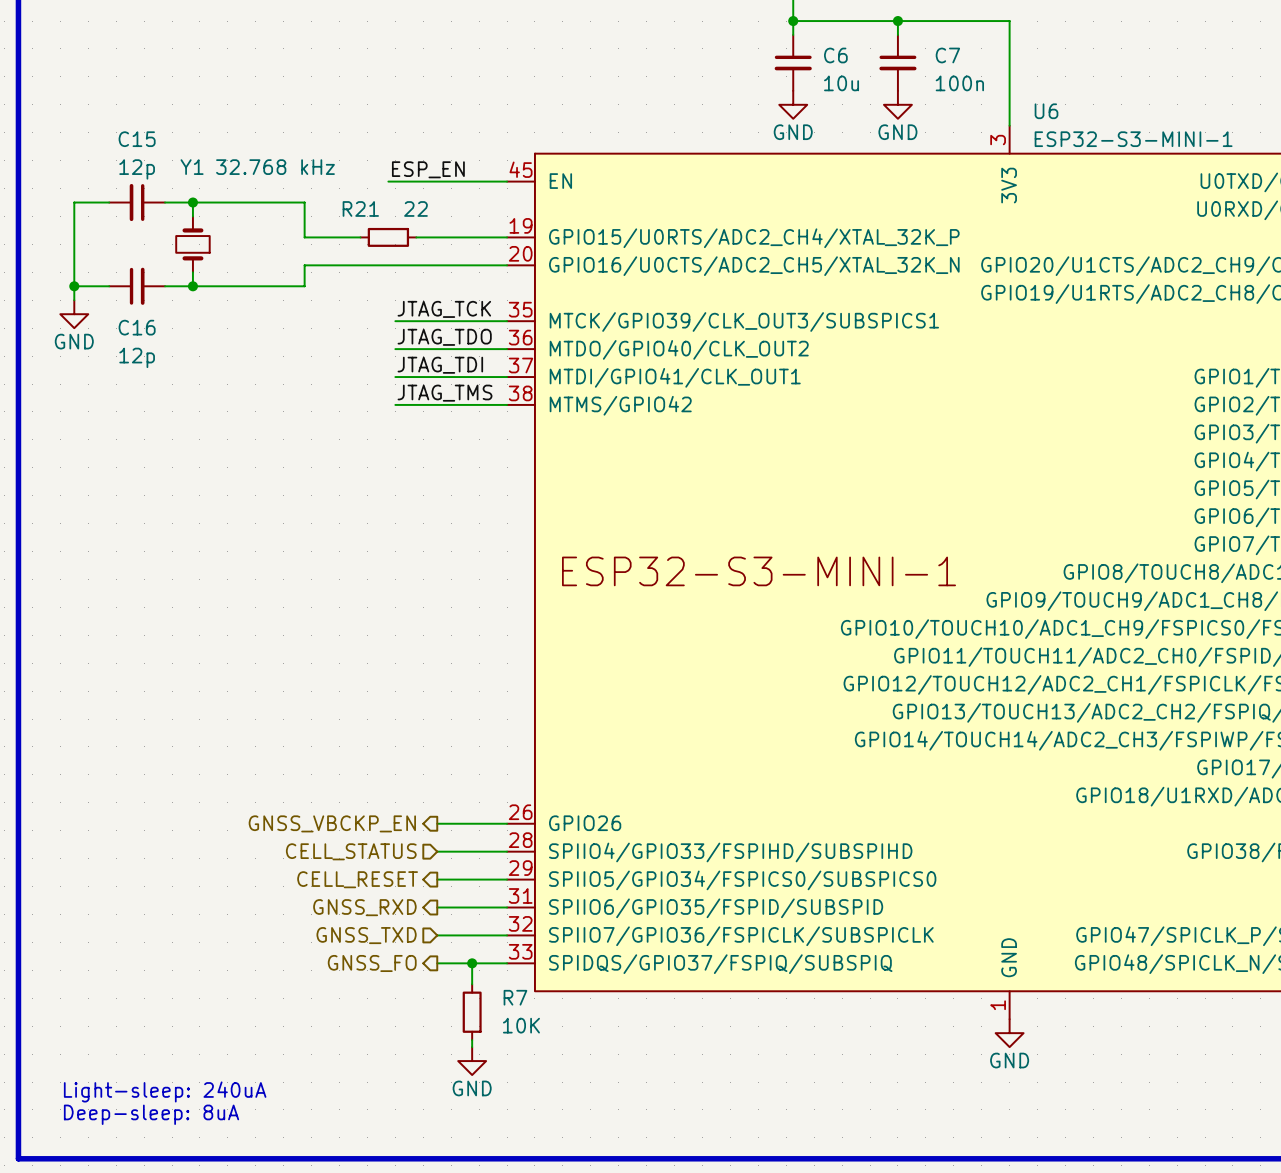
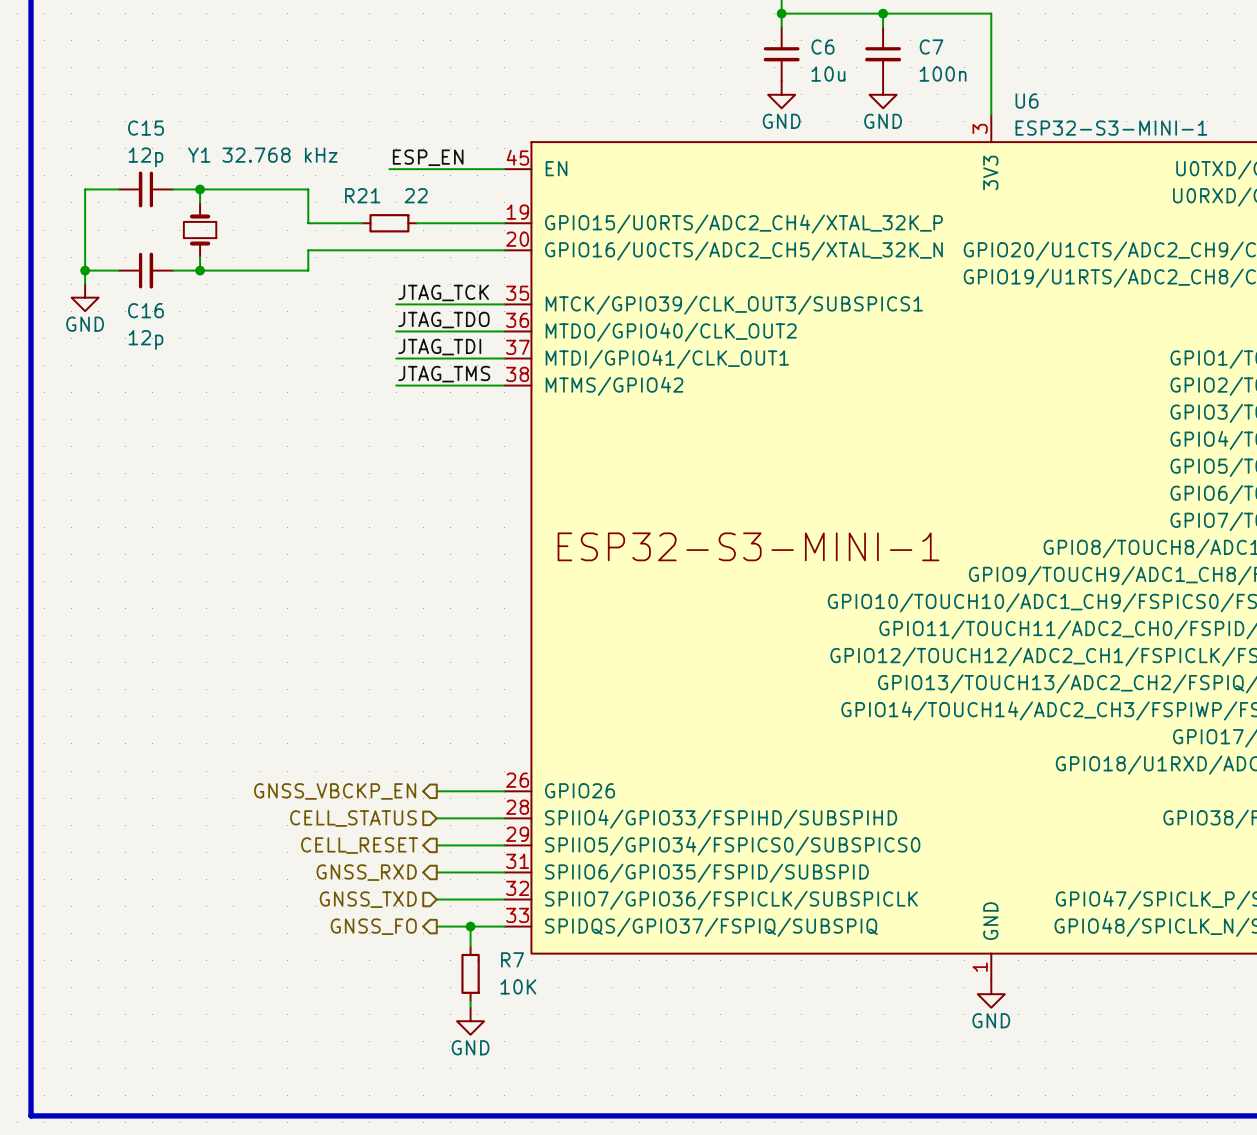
text: Light-sleep: 240uA (165, 1091) -> none
text: Deep-sleep: 8uA (151, 1114) -> none

